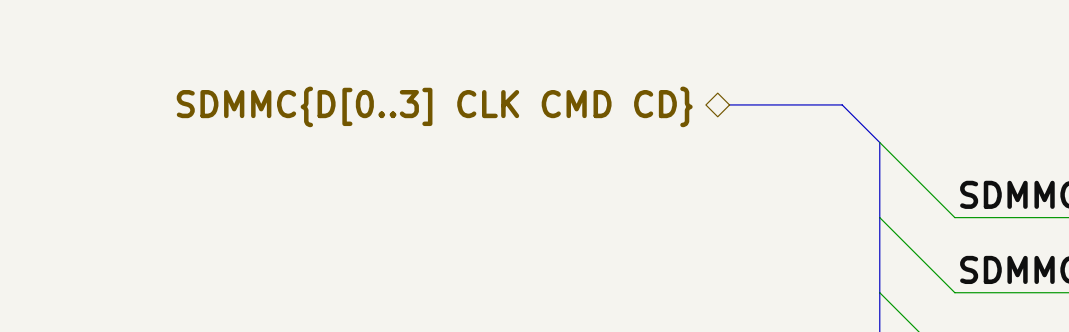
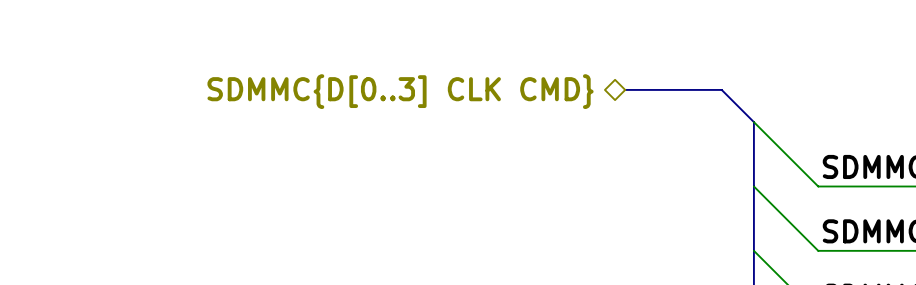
hierarchical label: SDMMC{D[0..3] CLK CMD CD} (434, 106) -> SDMMC{D[0..3] CLK CMD} (400, 91)

